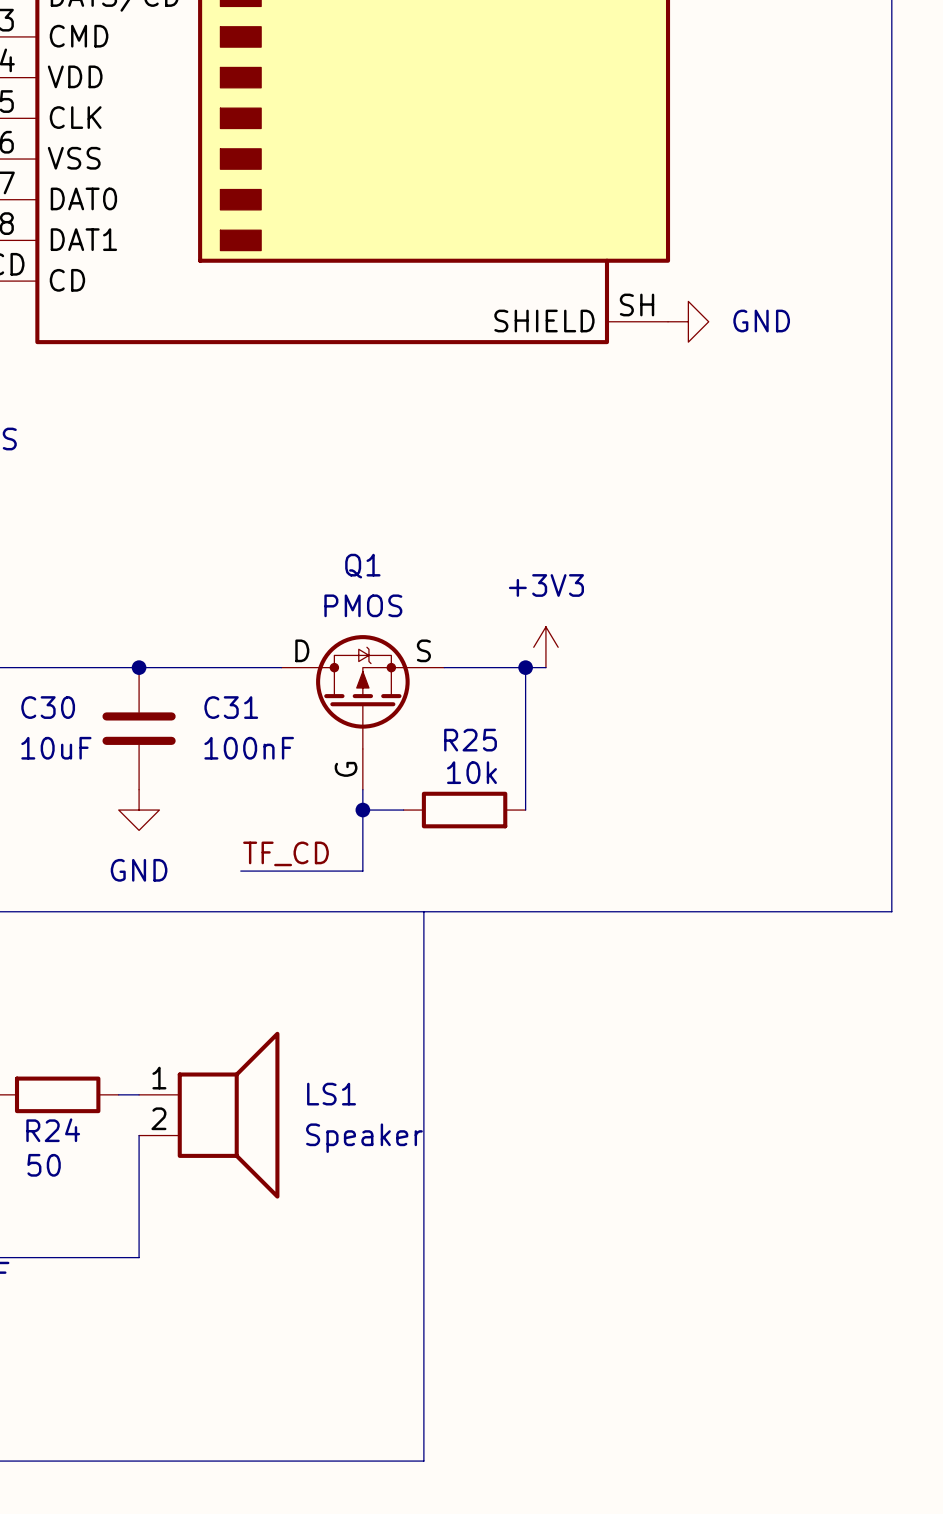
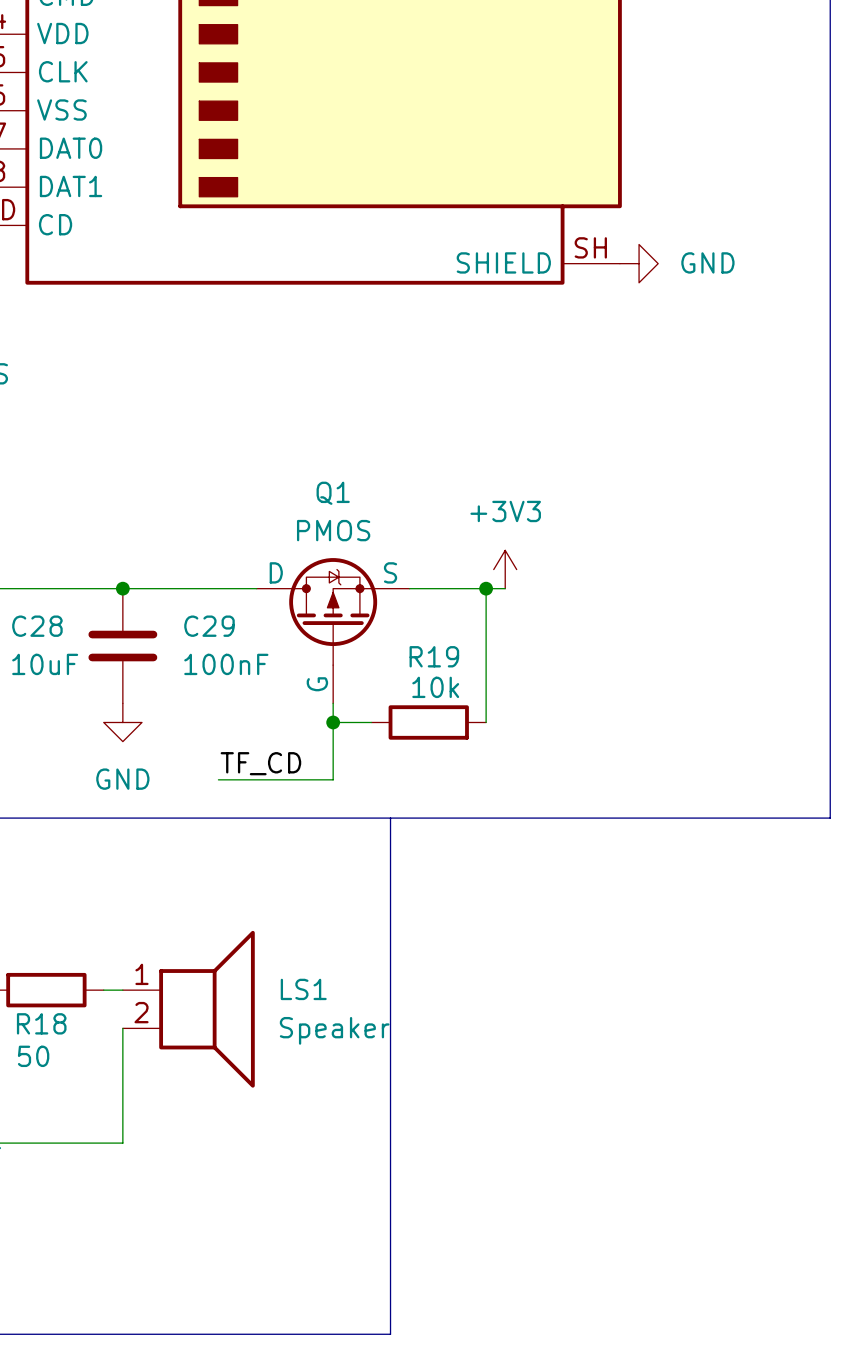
C30 name: C30 (48, 707) -> C28 (37, 626)
C31 name: C31 (231, 707) -> C29 (209, 626)
R25 name: R25 (470, 740) -> R19 (434, 656)
R24 name: R24 (53, 1130) -> R18 (41, 1023)

